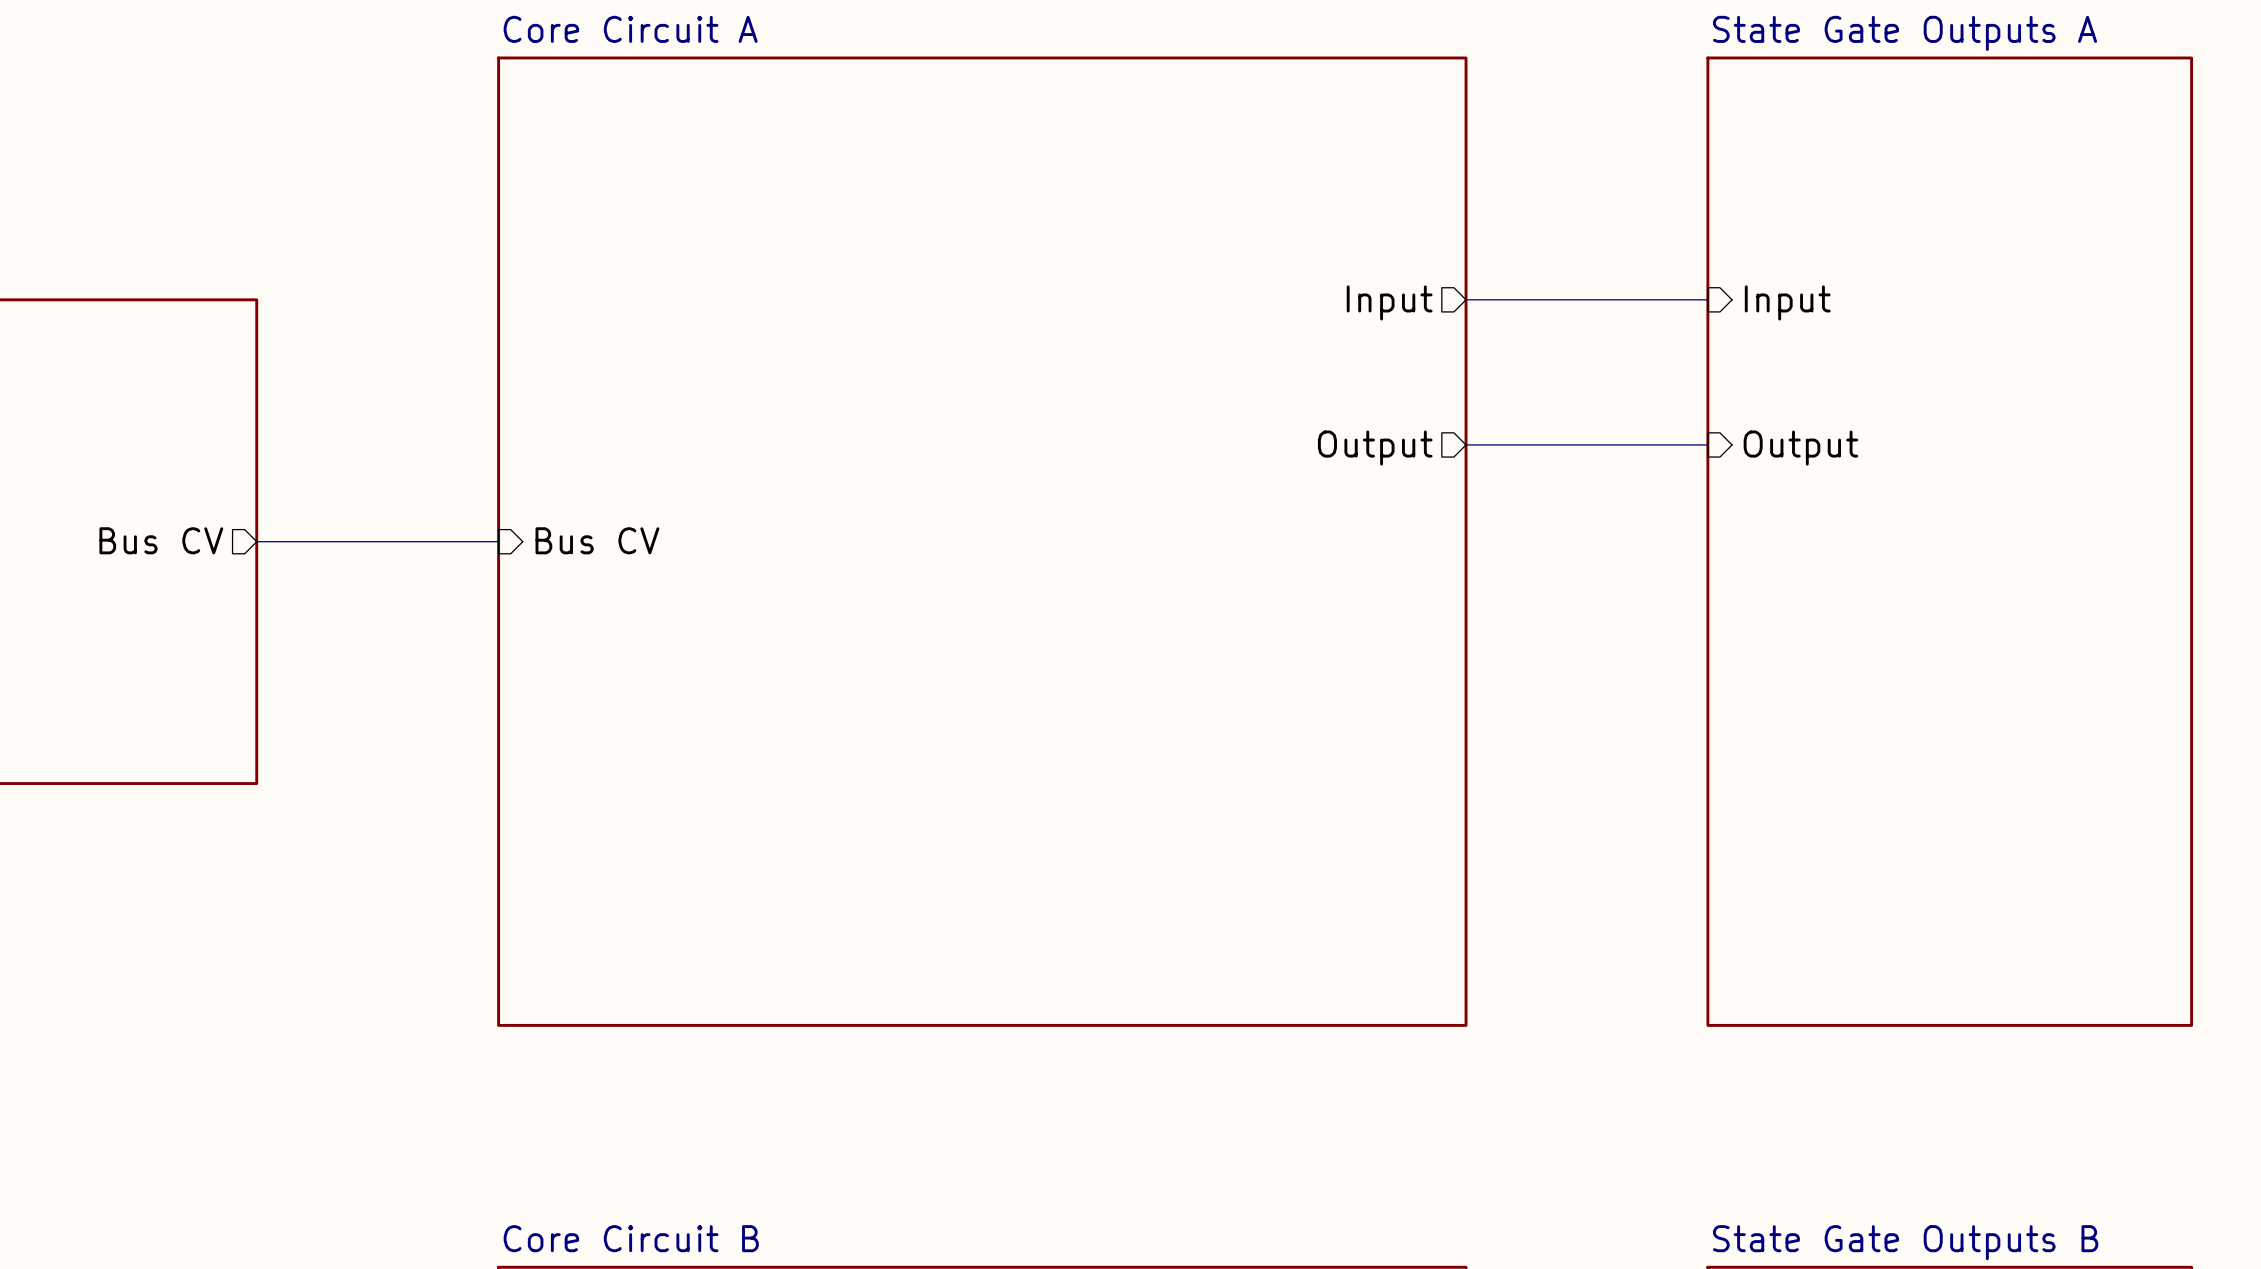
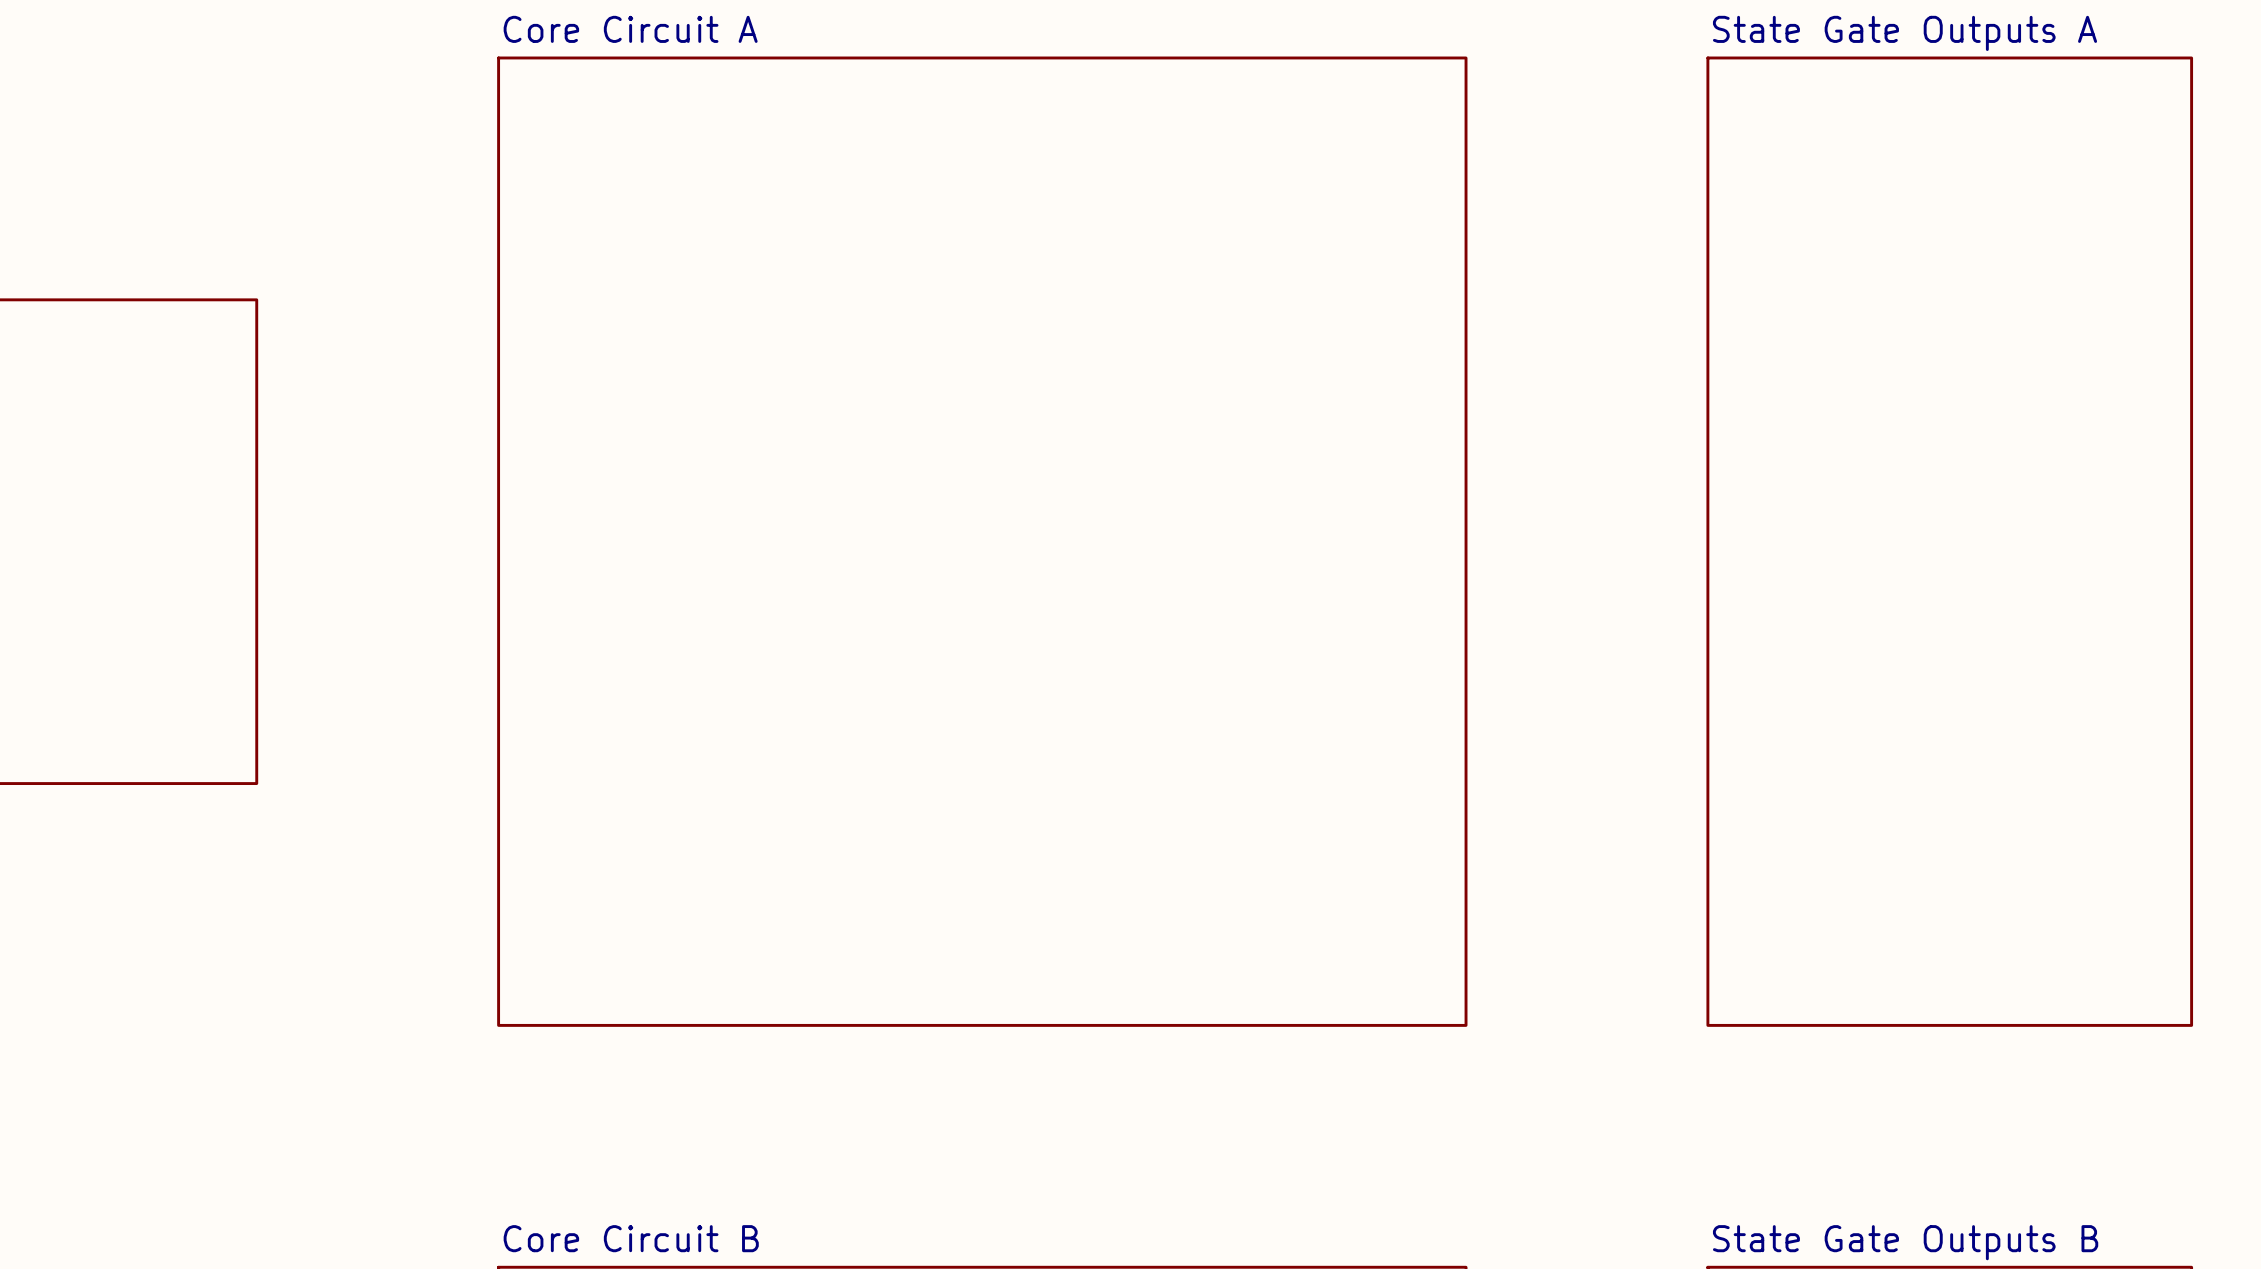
wire: (1466, 299) (1707, 299) -> none
sheet pin: Input (1389, 302) -> none
sheet pin: Input (1787, 302) -> none
wire: (1466, 444) (1707, 444) -> none
sheet pin: Output (1375, 448) -> none
sheet pin: Output (1800, 448) -> none
sheet pin: Bus CV (161, 540) -> none
sheet pin: Bus CV (597, 540) -> none
wire: (256, 541) (498, 541) -> none

